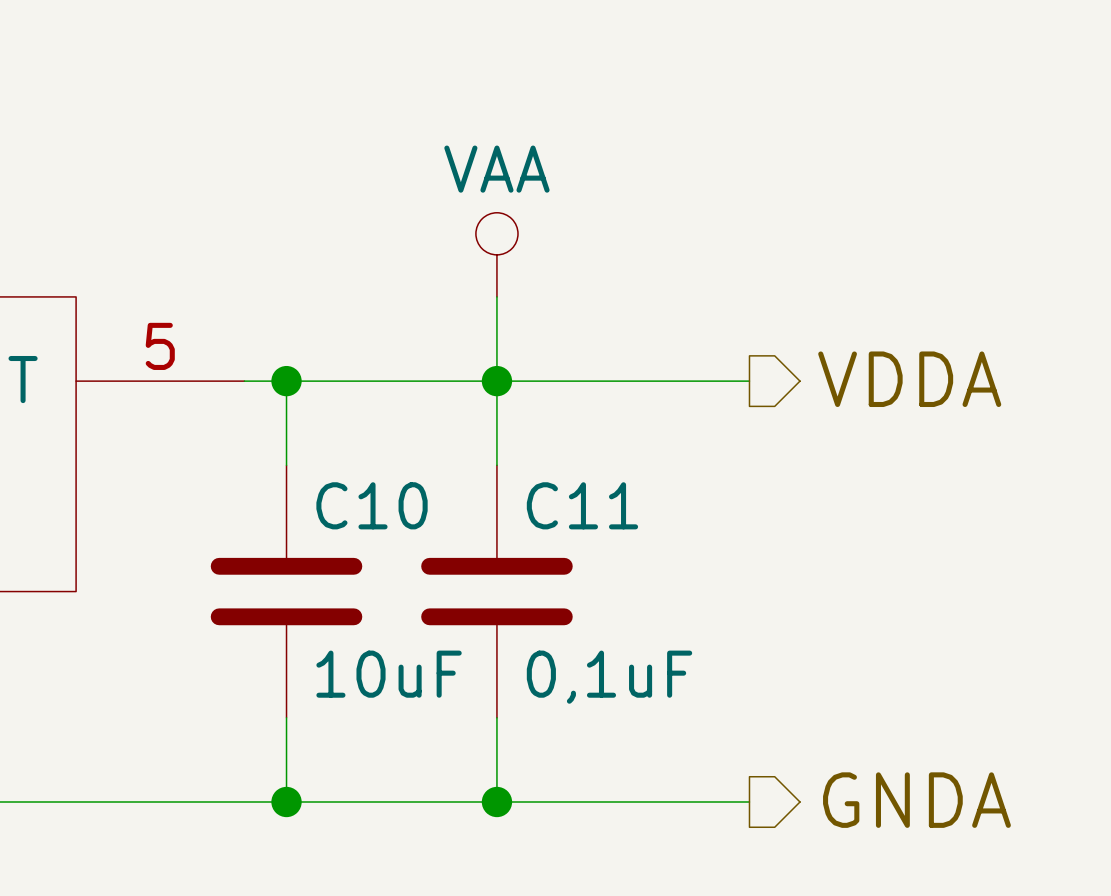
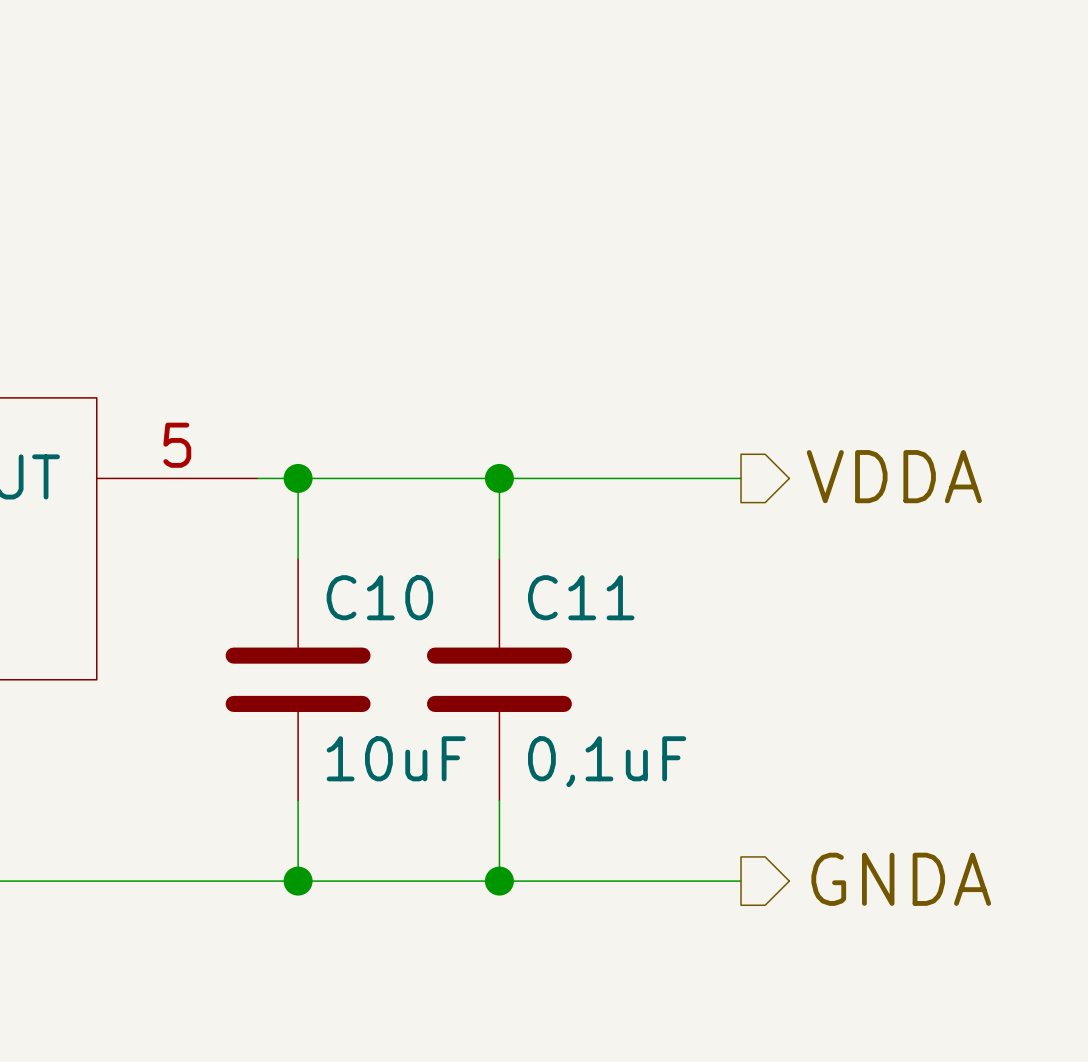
power symbol: VAA (496, 254) -> none
wire: (496, 296) (496, 381) -> none

